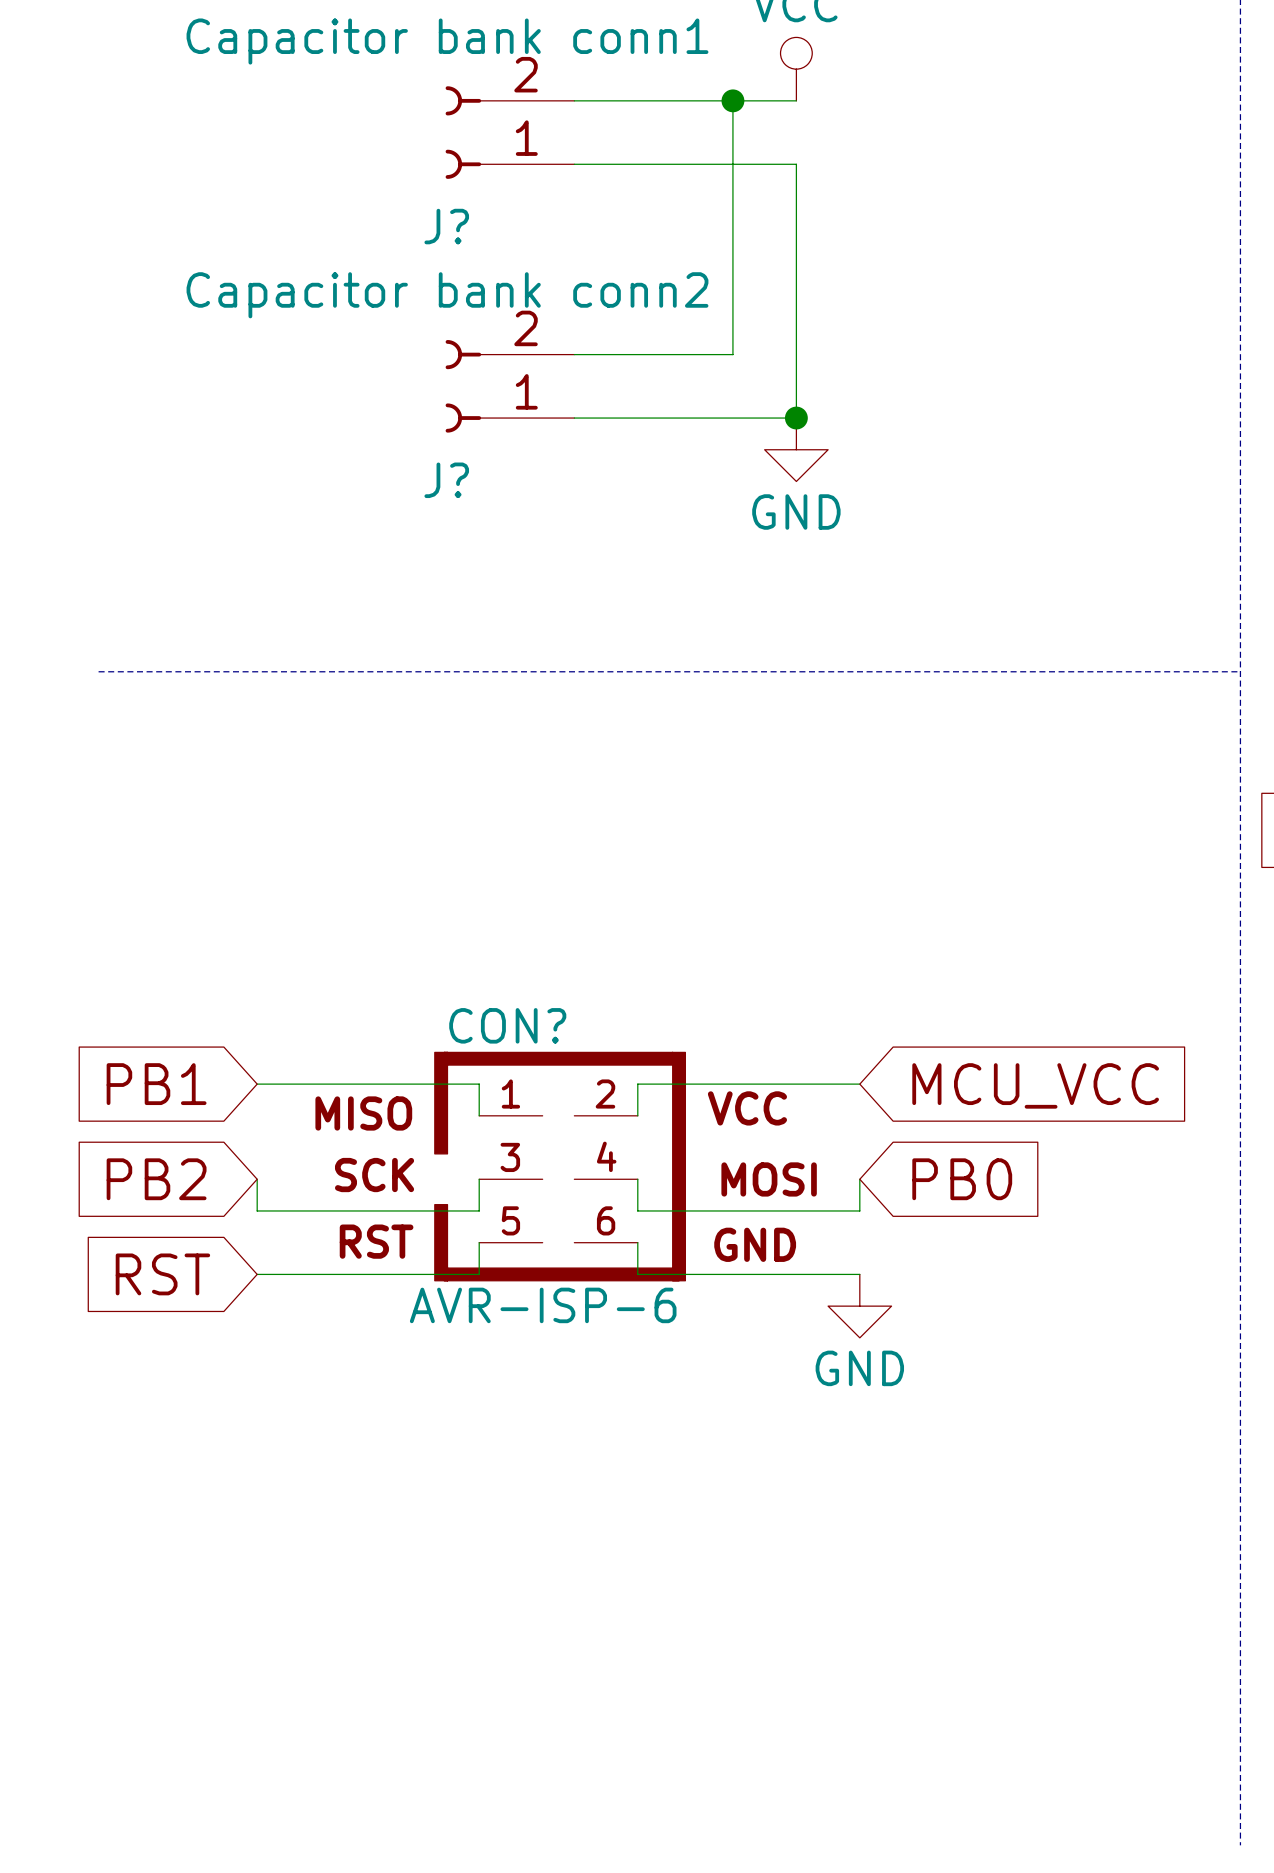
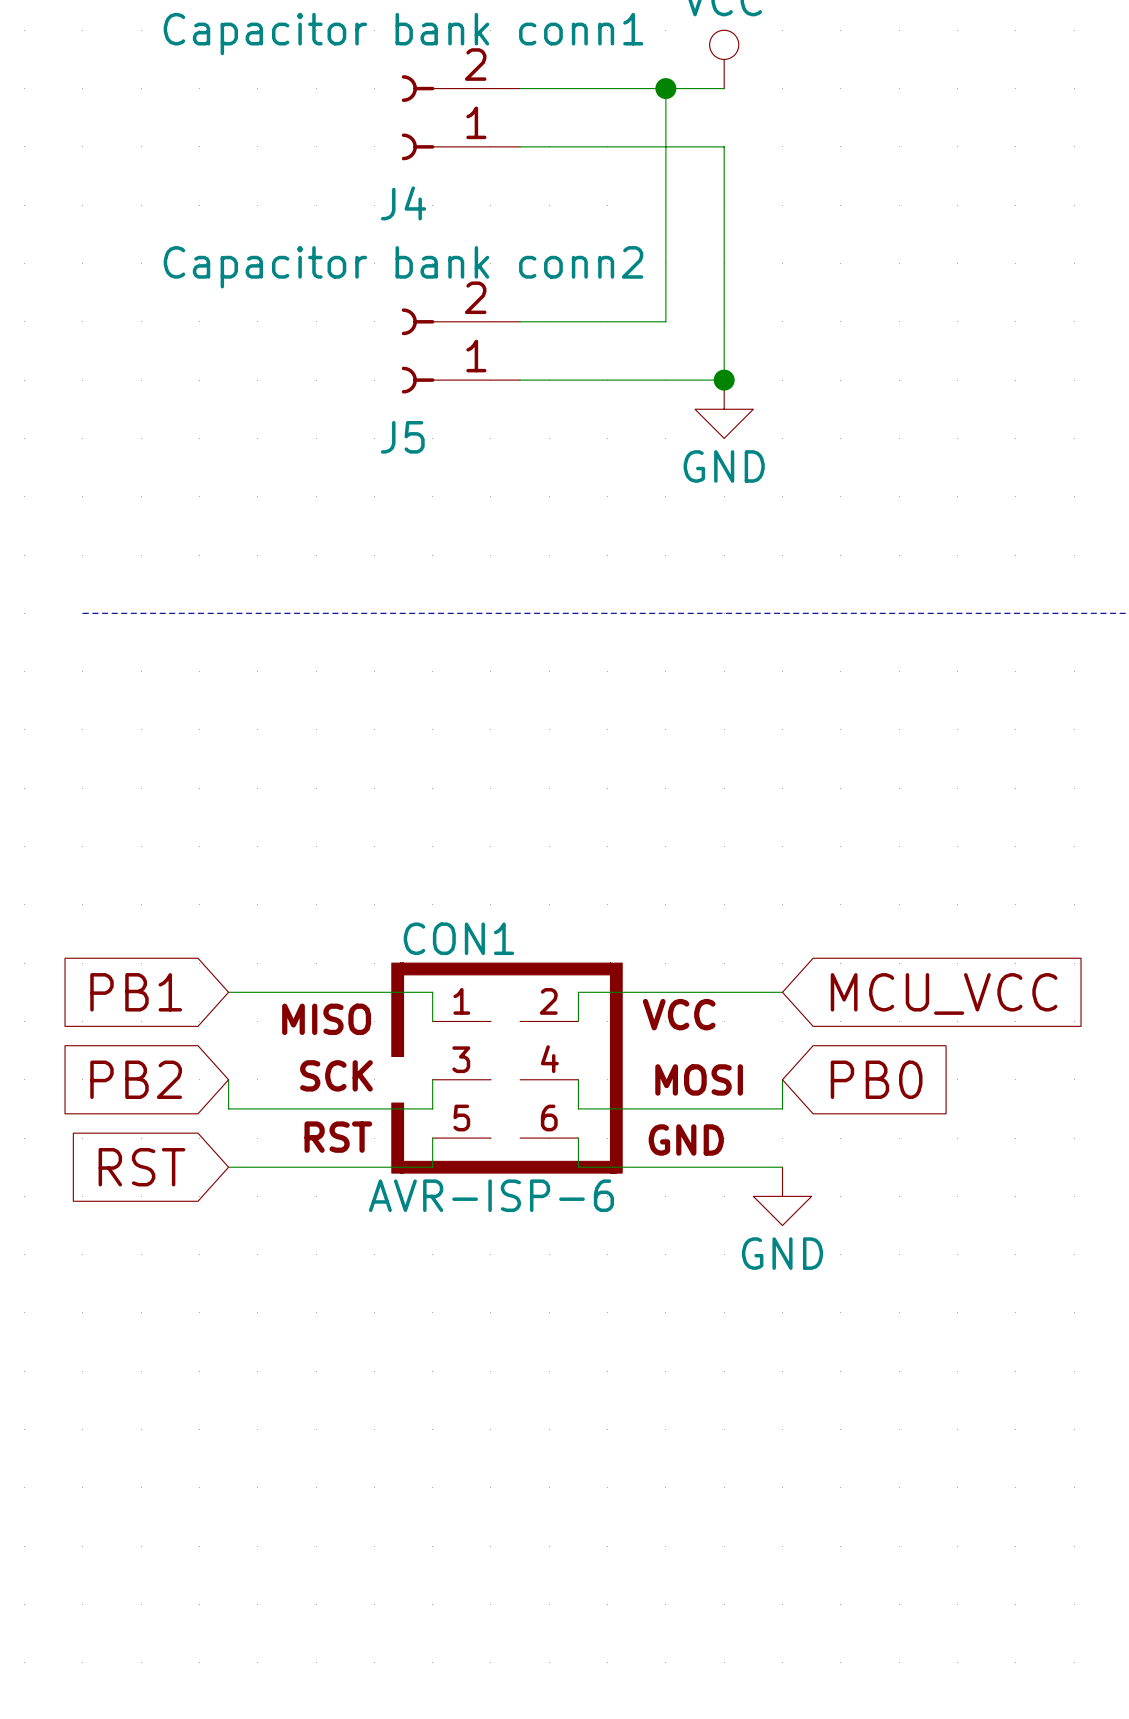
J? name: J? (446, 226) -> J4 (403, 203)
J? name: J? (446, 480) -> J5 (402, 437)
CON? name: CON? (507, 1025) -> CON1 (458, 938)

